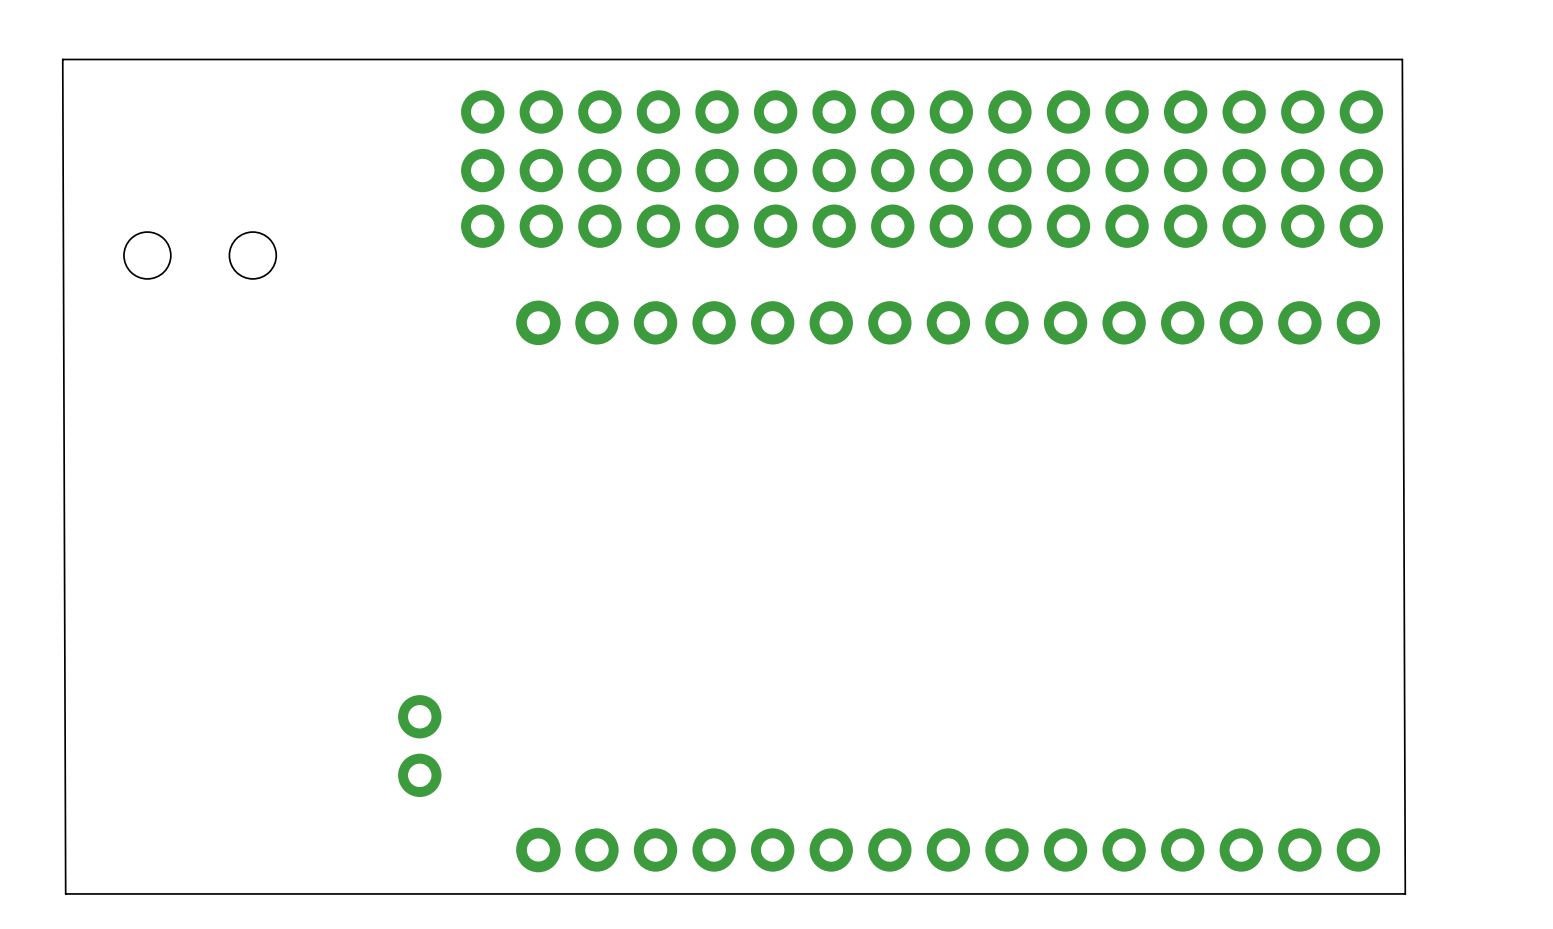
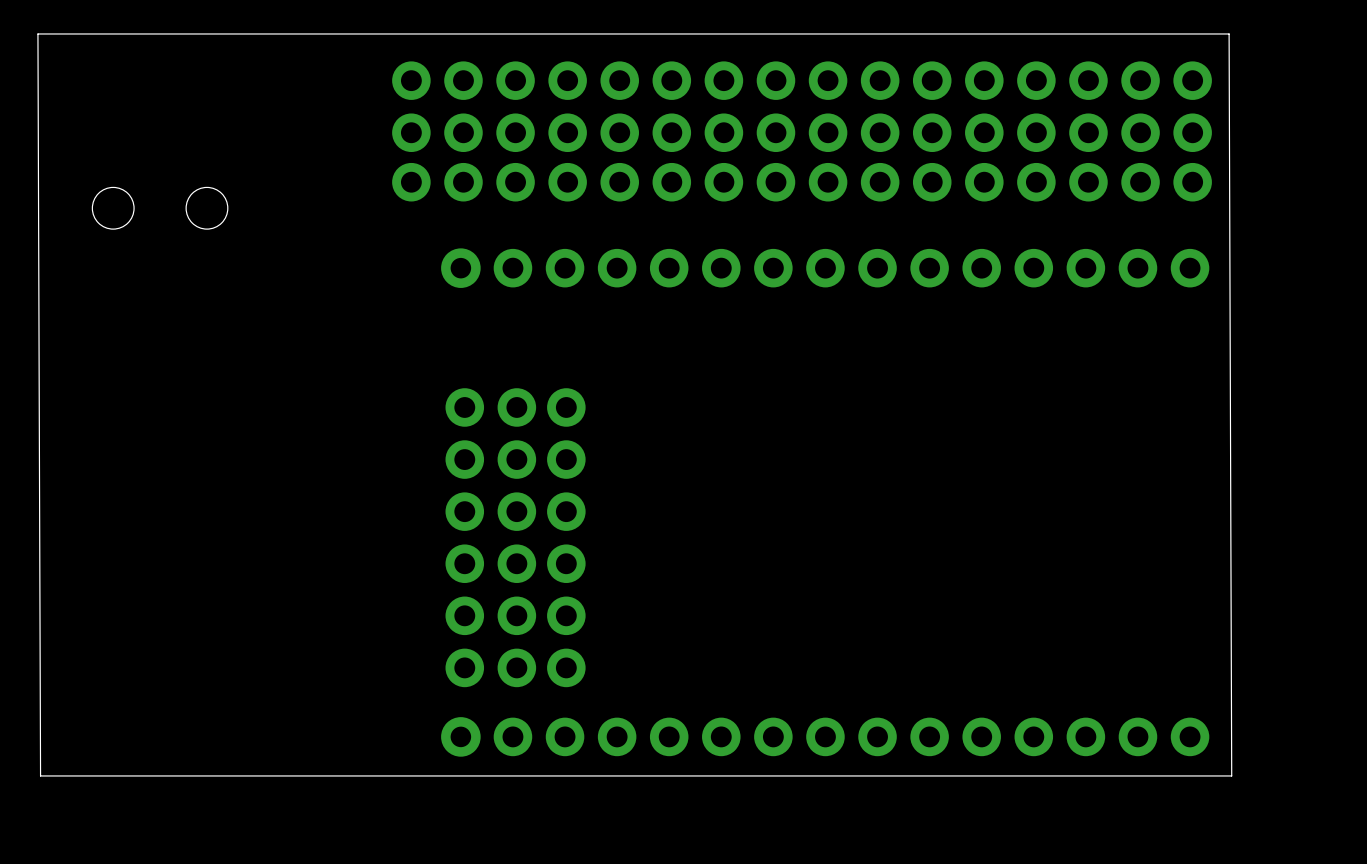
part: none -> (464, 537)
part: none -> (516, 537)
part: none -> (566, 537)
part: (419, 746) -> none

